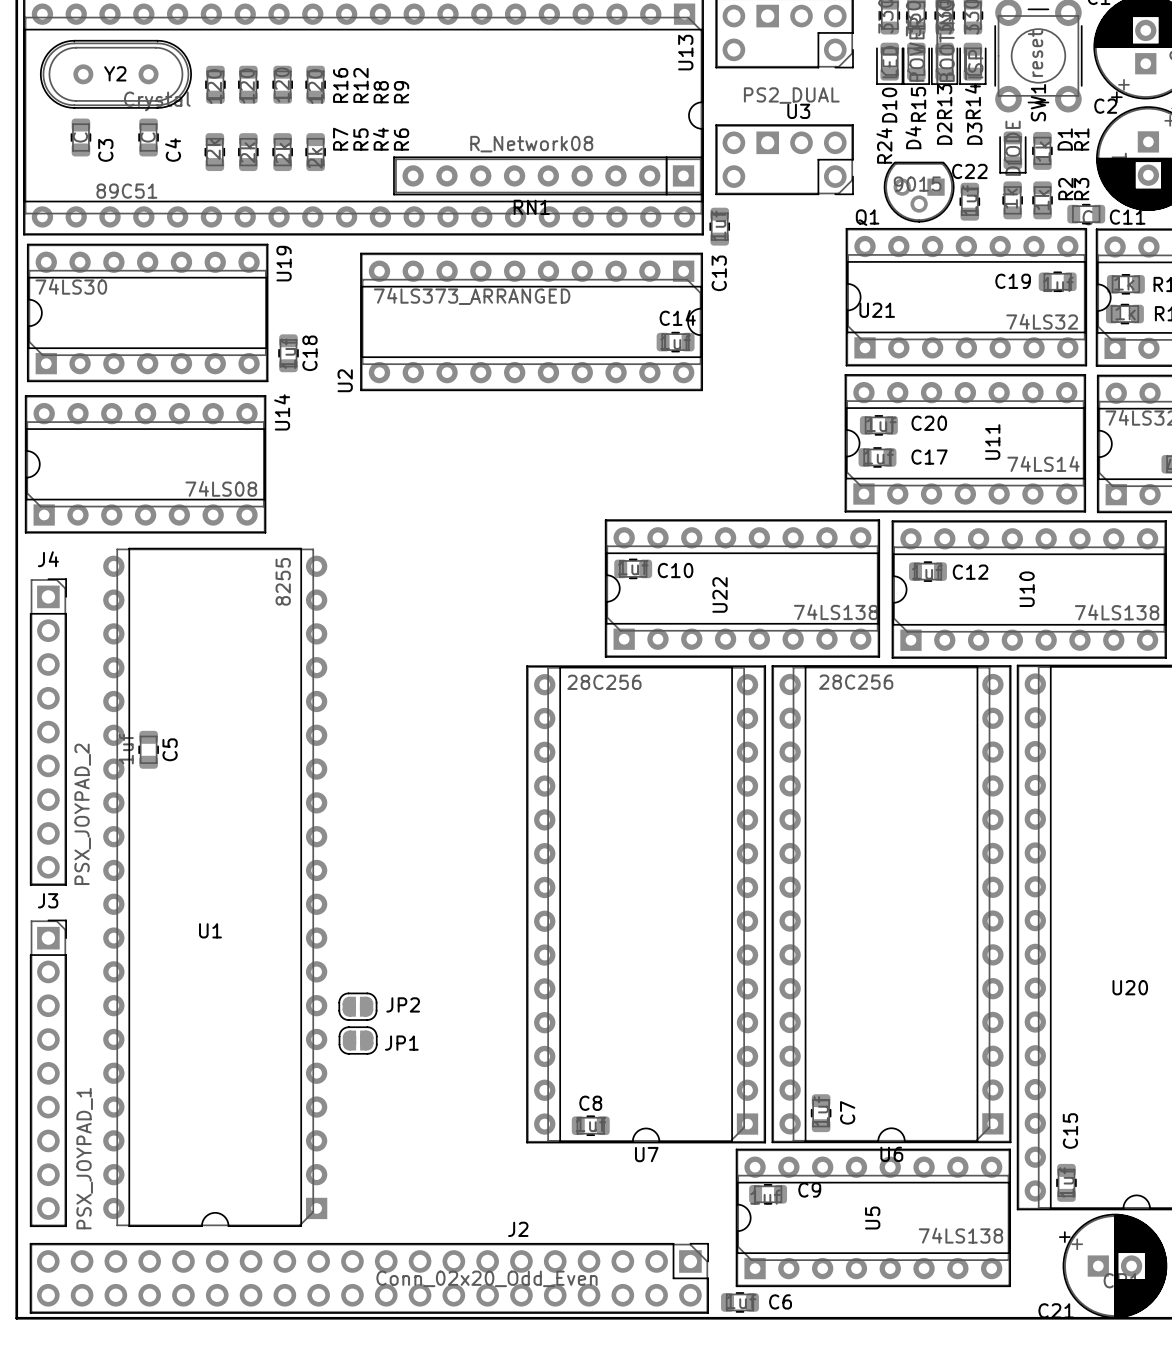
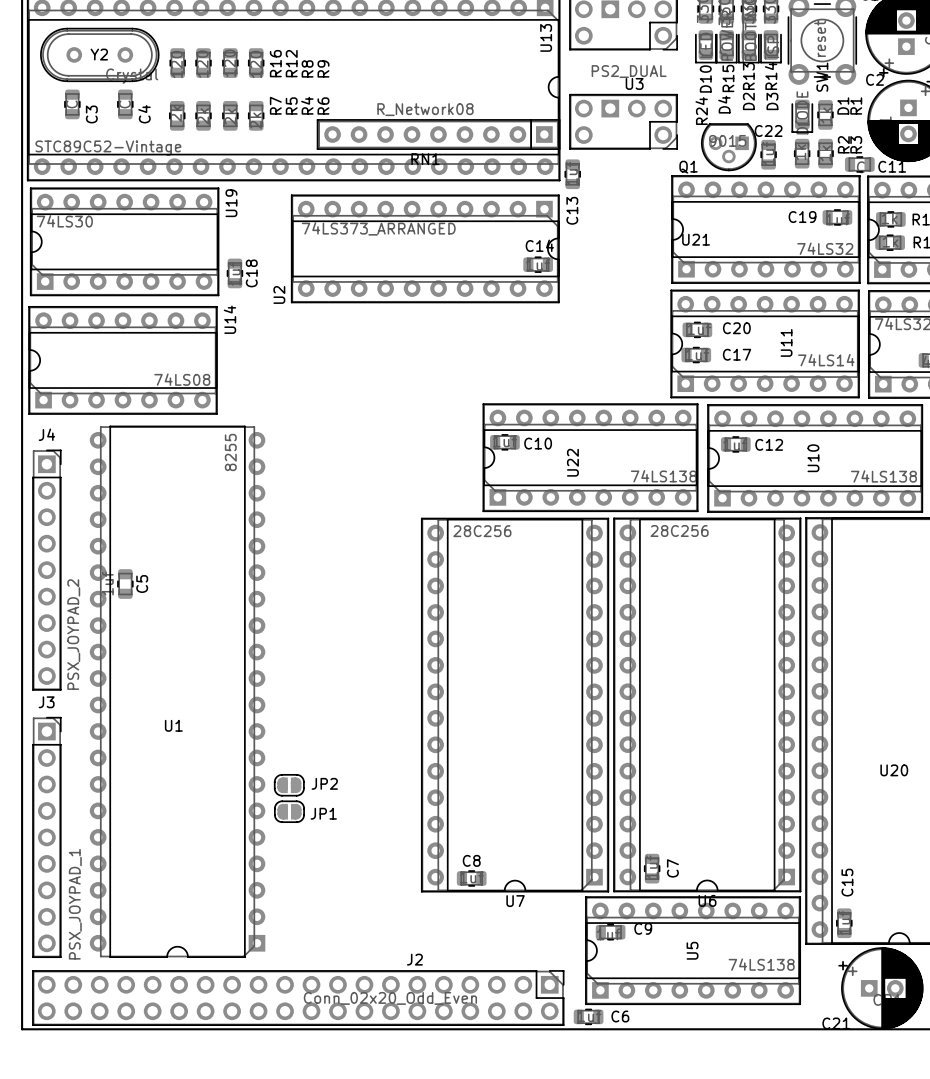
U13 value: 89C51 (126, 191) -> STC89C52-Vintage (108, 148)

